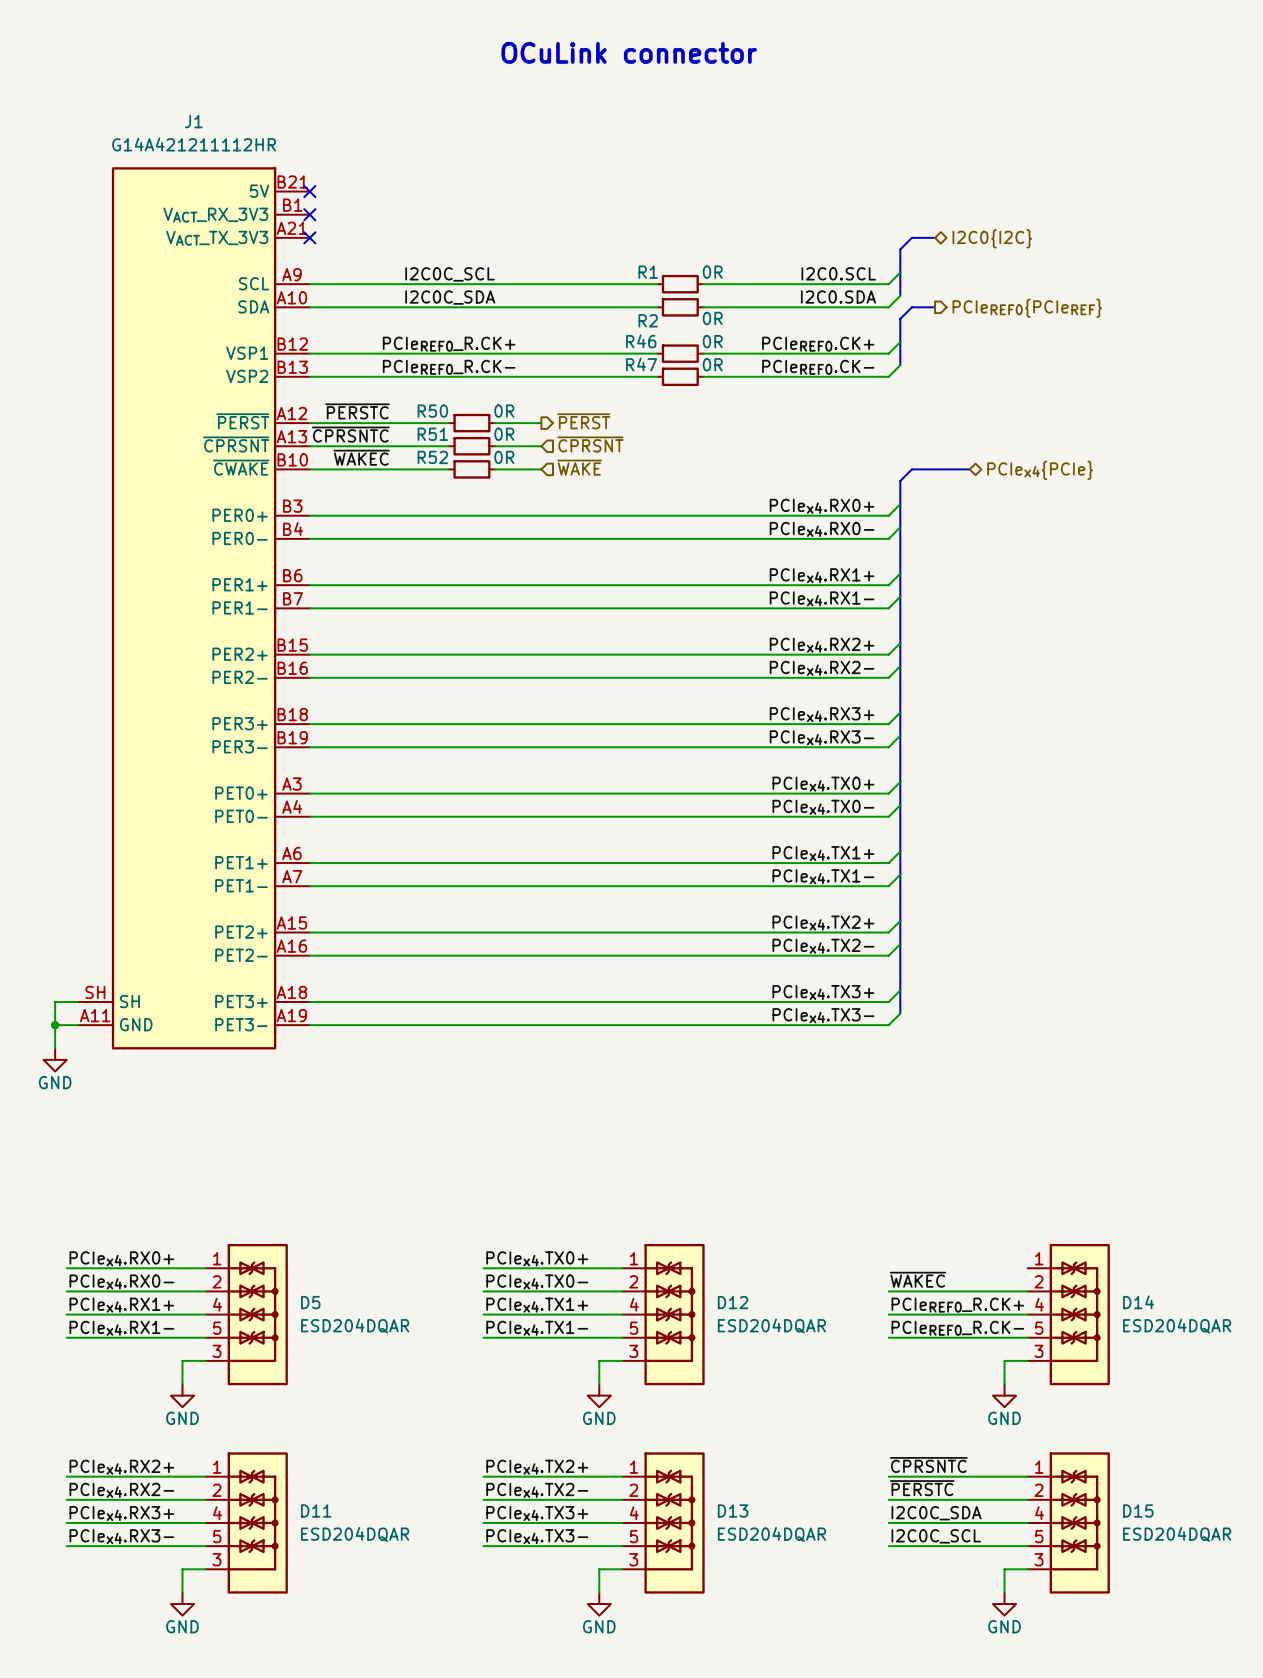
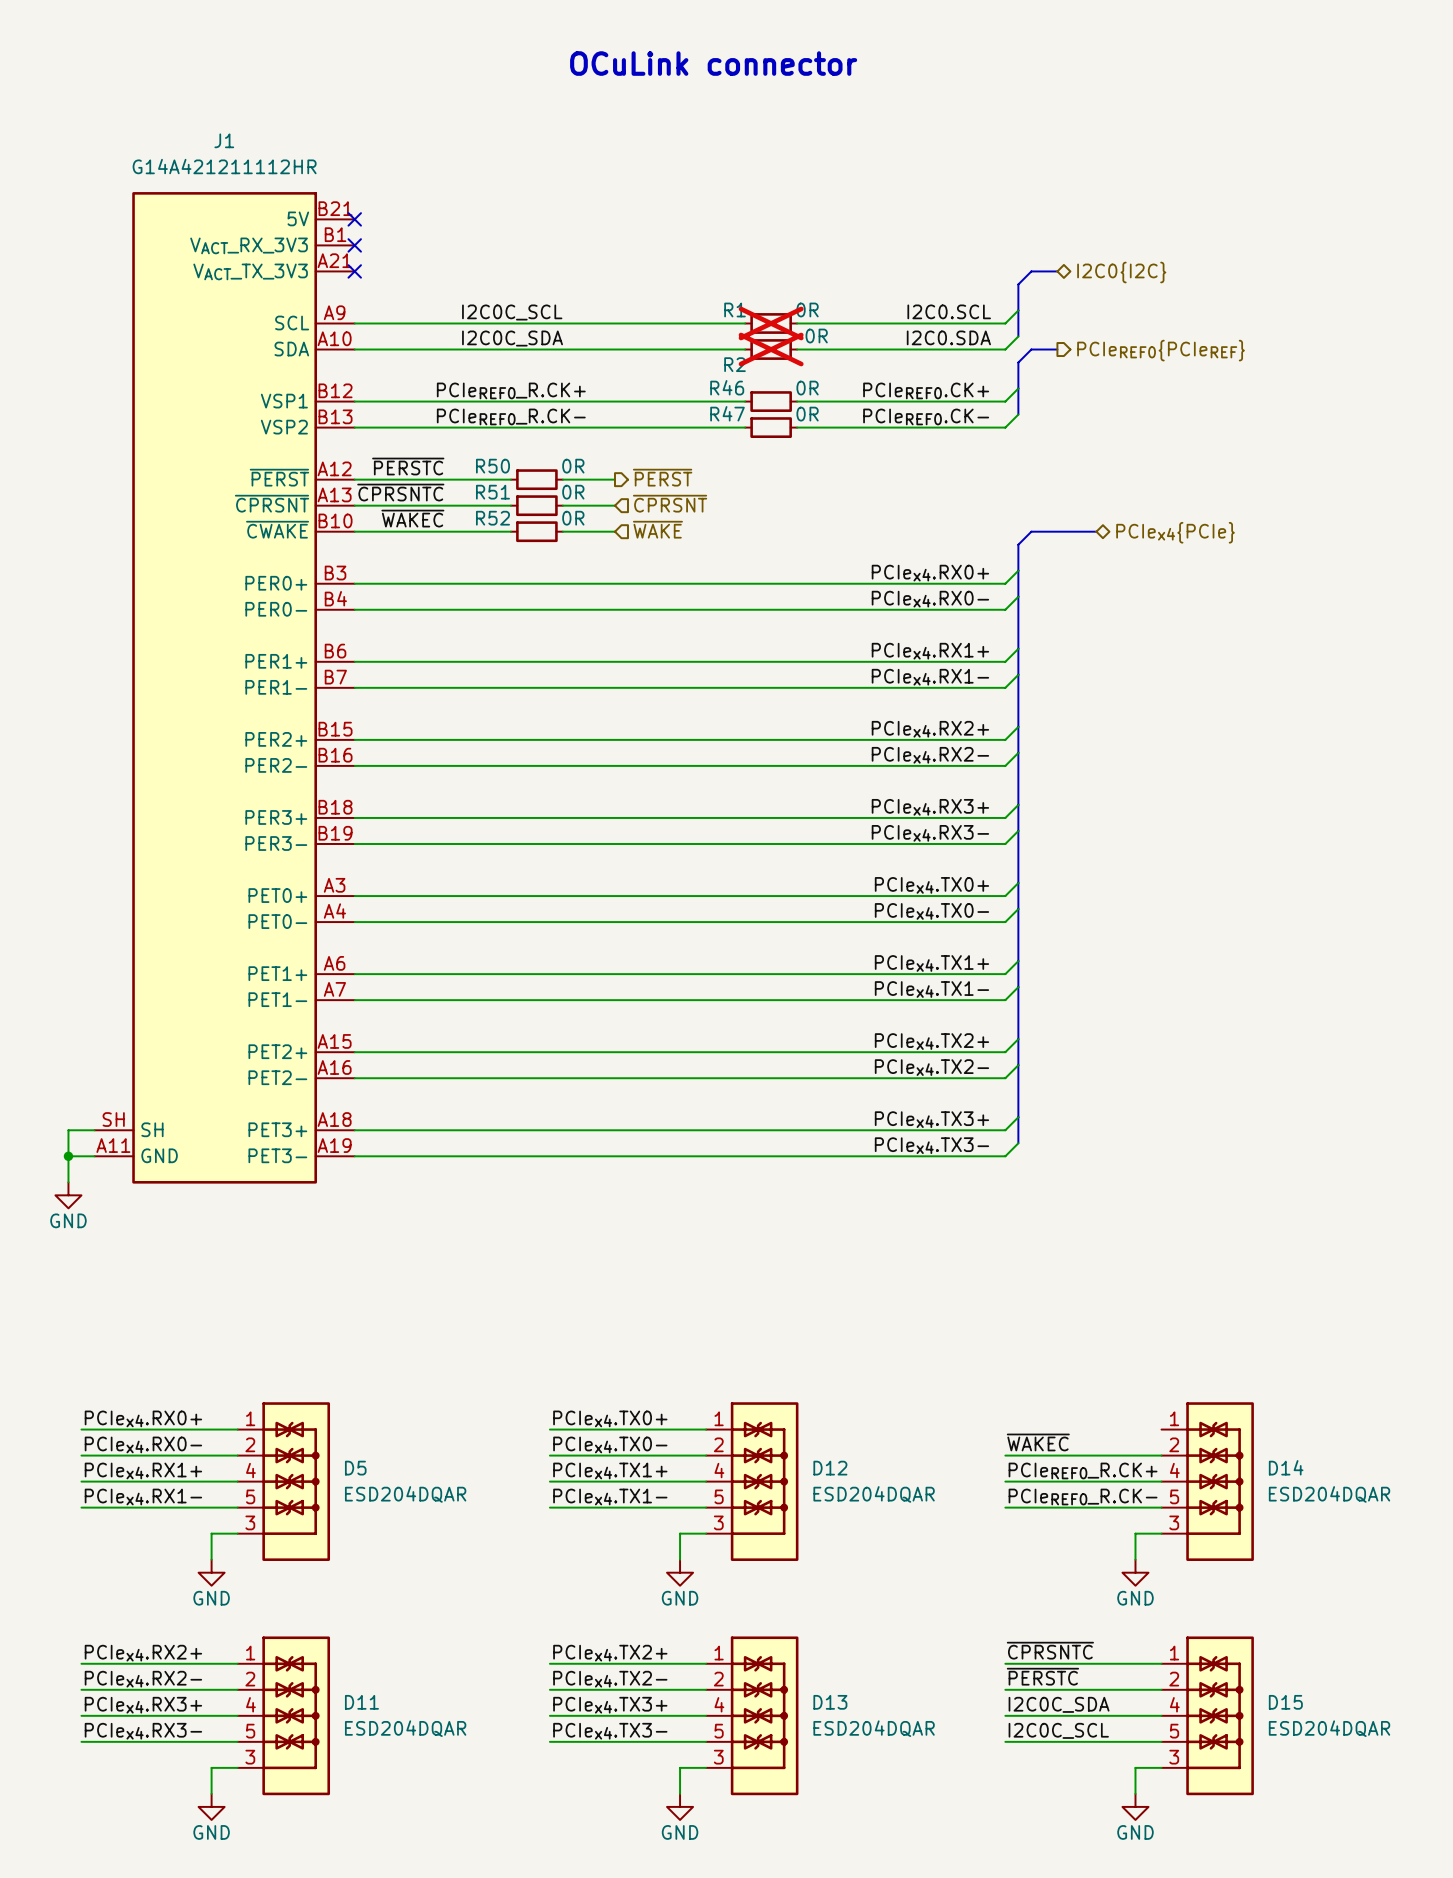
R1 do-not-place cross: none -> (771, 323)
R2 do-not-place cross: none -> (771, 349)
R2 text position: 0R (712, 318) -> 0R (816, 336)

